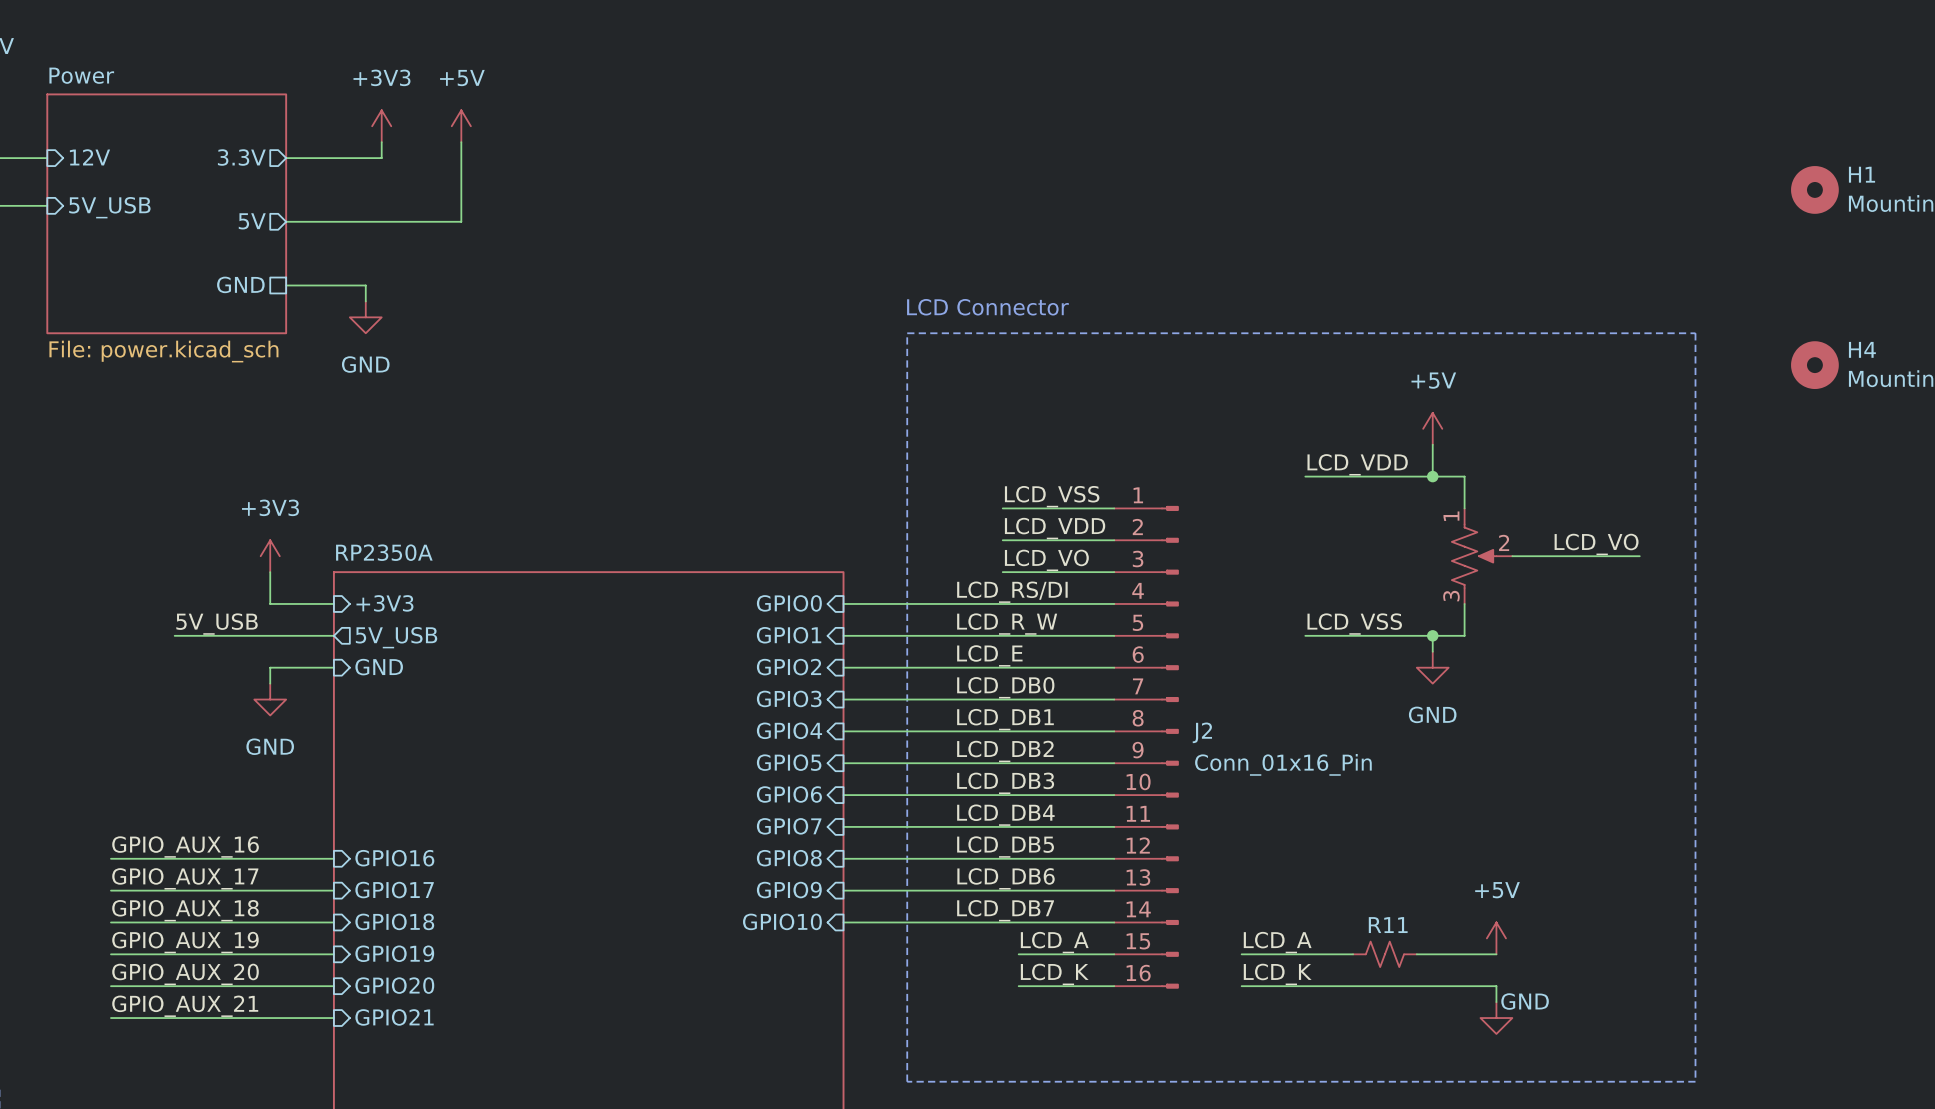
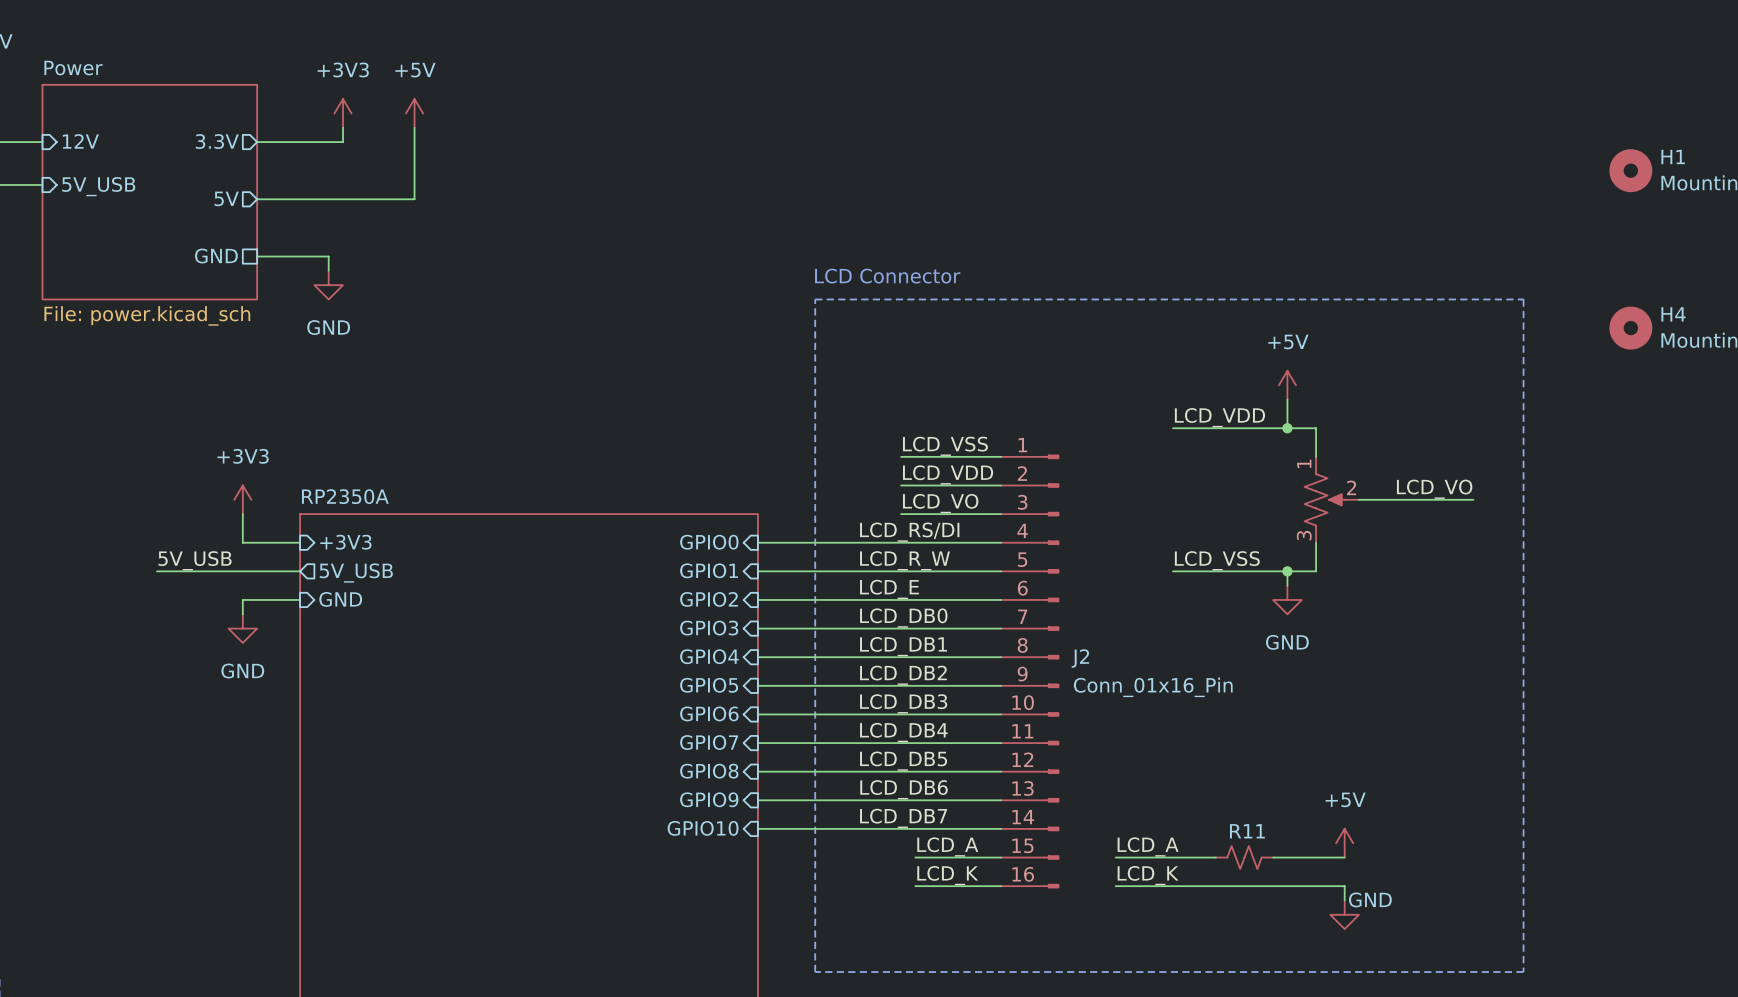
label: GPIO_AUX_16 (185, 847) -> none
wire: (110, 858) (333, 858) -> none
sheet pin: GPIO16 (394, 858) -> none
label: GPIO_AUX_17 (185, 878) -> none
wire: (110, 890) (333, 890) -> none
sheet pin: GPIO17 (394, 890) -> none
label: GPIO_AUX_18 (185, 910) -> none
sheet pin: GPIO18 (394, 921) -> none
wire: (110, 922) (333, 922) -> none
label: GPIO_AUX_19 (185, 942) -> none
sheet pin: GPIO19 (394, 953) -> none
wire: (110, 954) (333, 954) -> none
label: GPIO_AUX_20 (185, 974) -> none
sheet pin: GPIO20 (394, 985) -> none
wire: (110, 986) (333, 986) -> none
label: GPIO_AUX_21 (185, 1006) -> none
sheet pin: GPIO21 (394, 1017) -> none
wire: (110, 1018) (333, 1018) -> none

